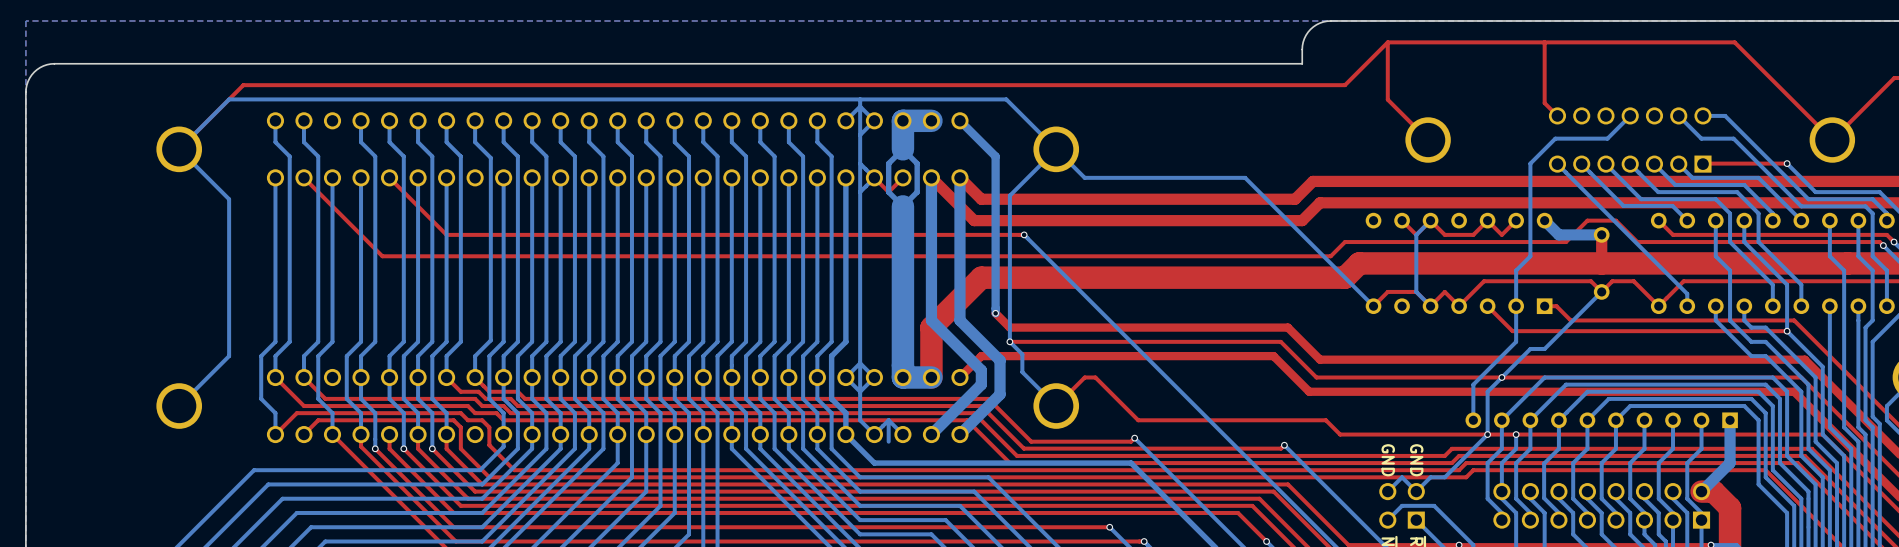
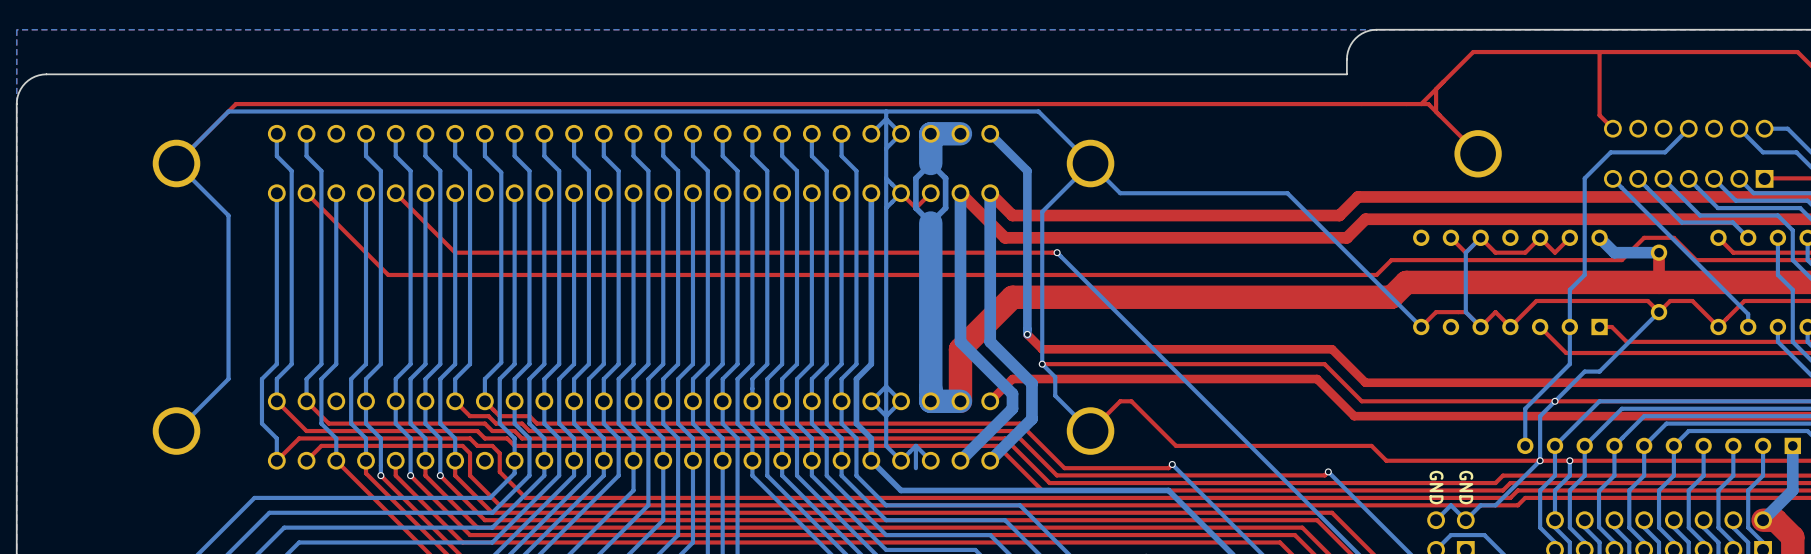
top track: (1387, 42) (1345, 85) (243, 85) (236, 92) -> (1436, 111) (1428, 104) (235, 104)
top track: (1387, 42) (1387, 78) -> none
top track: (1423, 42) (1387, 42) -> (1473, 52) (1421, 104)

